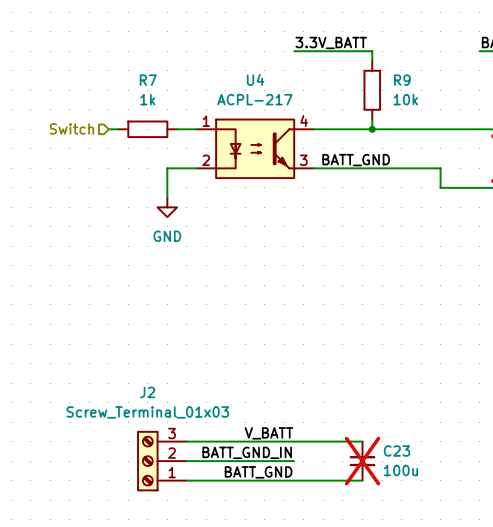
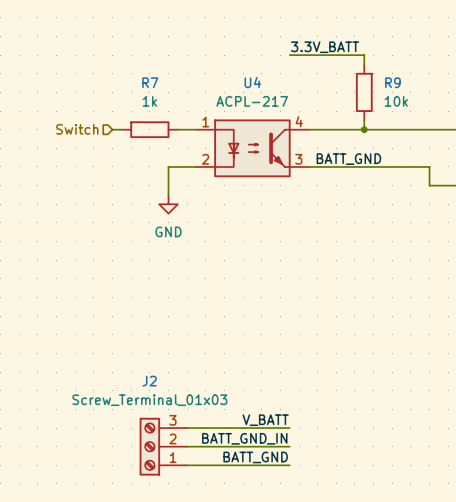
wire: (294, 441) (362, 441) -> none
C23: 100u (362, 461) -> none
wire: (294, 480) (362, 480) -> none

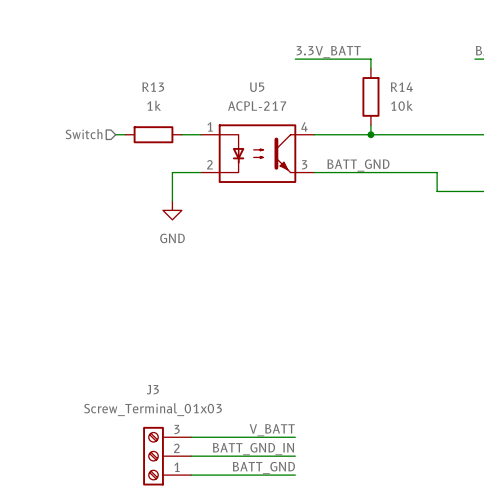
R7 name: R7 (150, 82) -> R13 (153, 87)
U4 name: U4 (252, 82) -> U5 (257, 87)
R9 name: R9 (392, 82) -> R14 (401, 87)
J2 name: J2 (149, 381) -> J3 (152, 389)

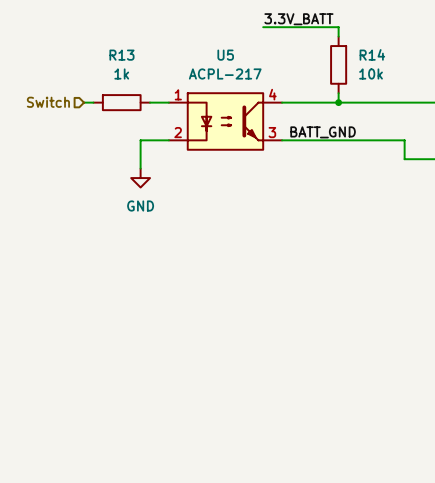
label: V_BATT (272, 430) -> none
wire: (191, 437) (295, 437) -> none
label: BATT_GND_IN (253, 449) -> none
J3: Screw_Terminal_01x03 (167, 456) -> none
wire: (191, 456) (295, 456) -> none
label: BATT_GND (263, 468) -> none
wire: (191, 475) (295, 475) -> none

